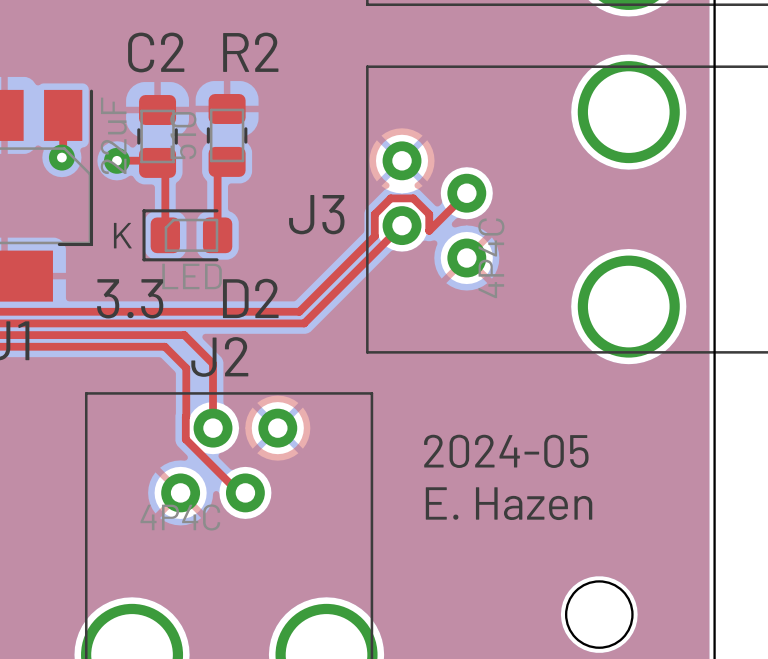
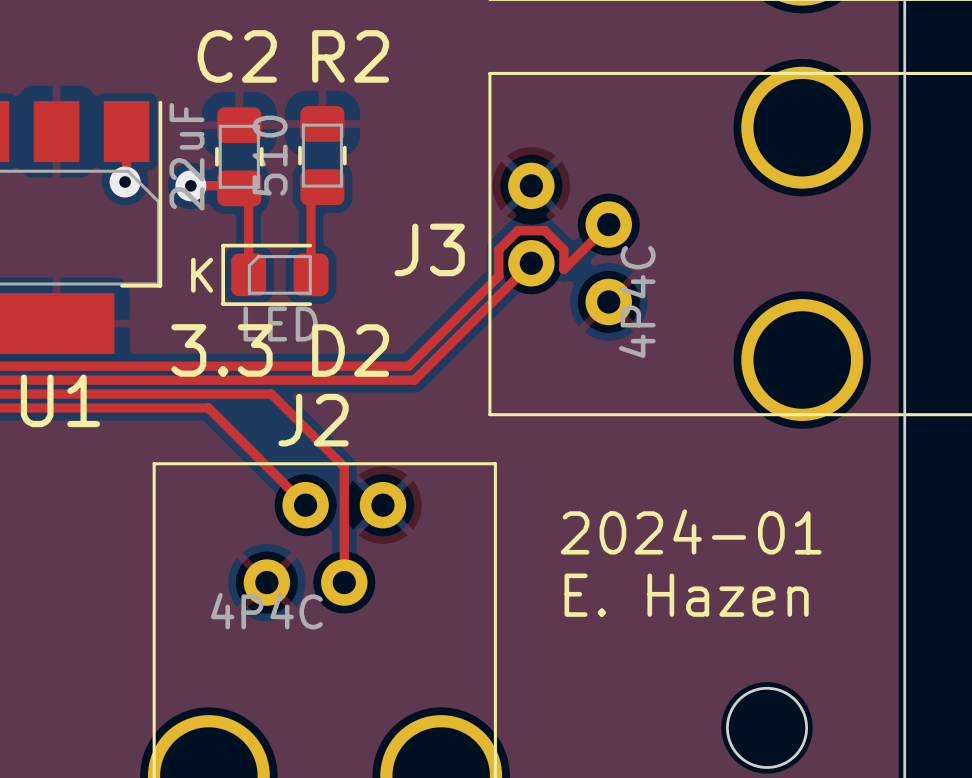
top track: (131, 346) (164, 346) (186, 368) (185, 439) (239, 492) (245, 492) -> (208, 407) (305, 505)
top track: (213, 363) (213, 428) -> (305, 428) (344, 467) (344, 582)
text: 2024-05 (506, 451) -> 2024-01 (691, 531)

